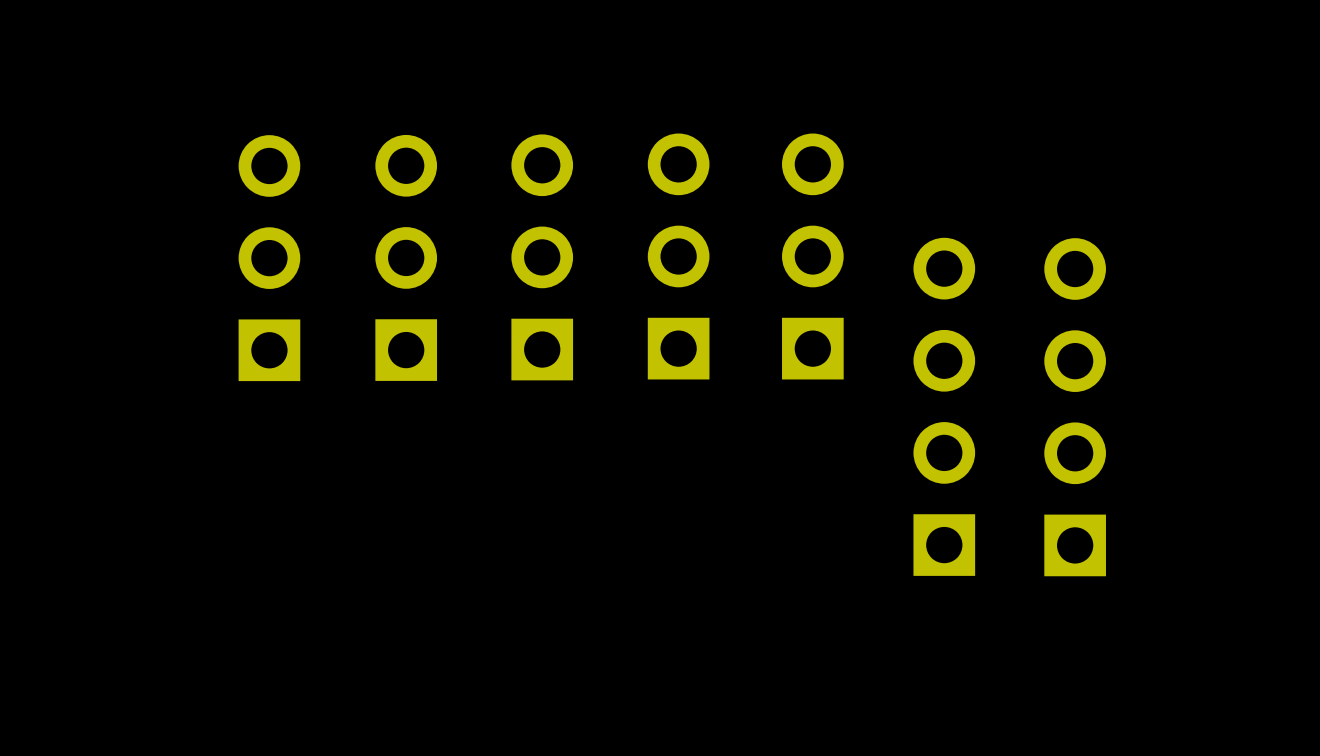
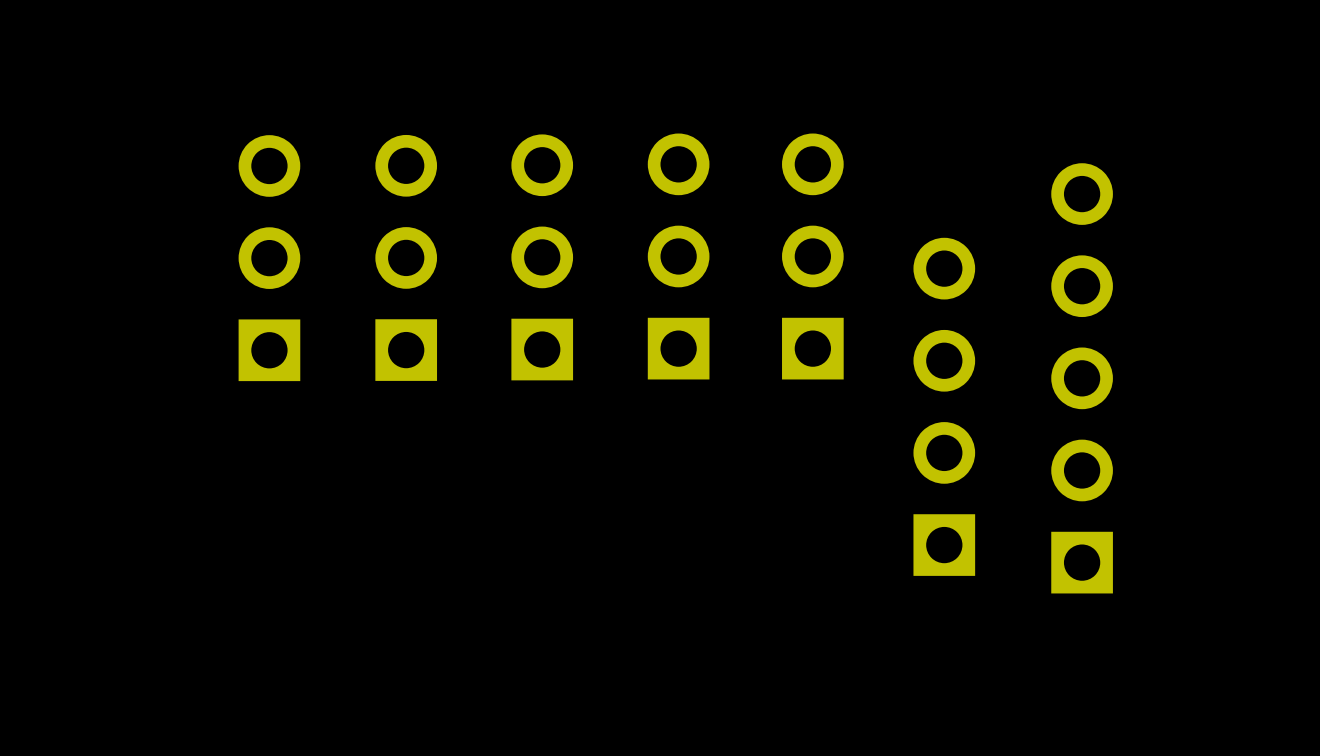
part footprint: [1044, 238, 1106, 577] -> [1051, 163, 1113, 594]

